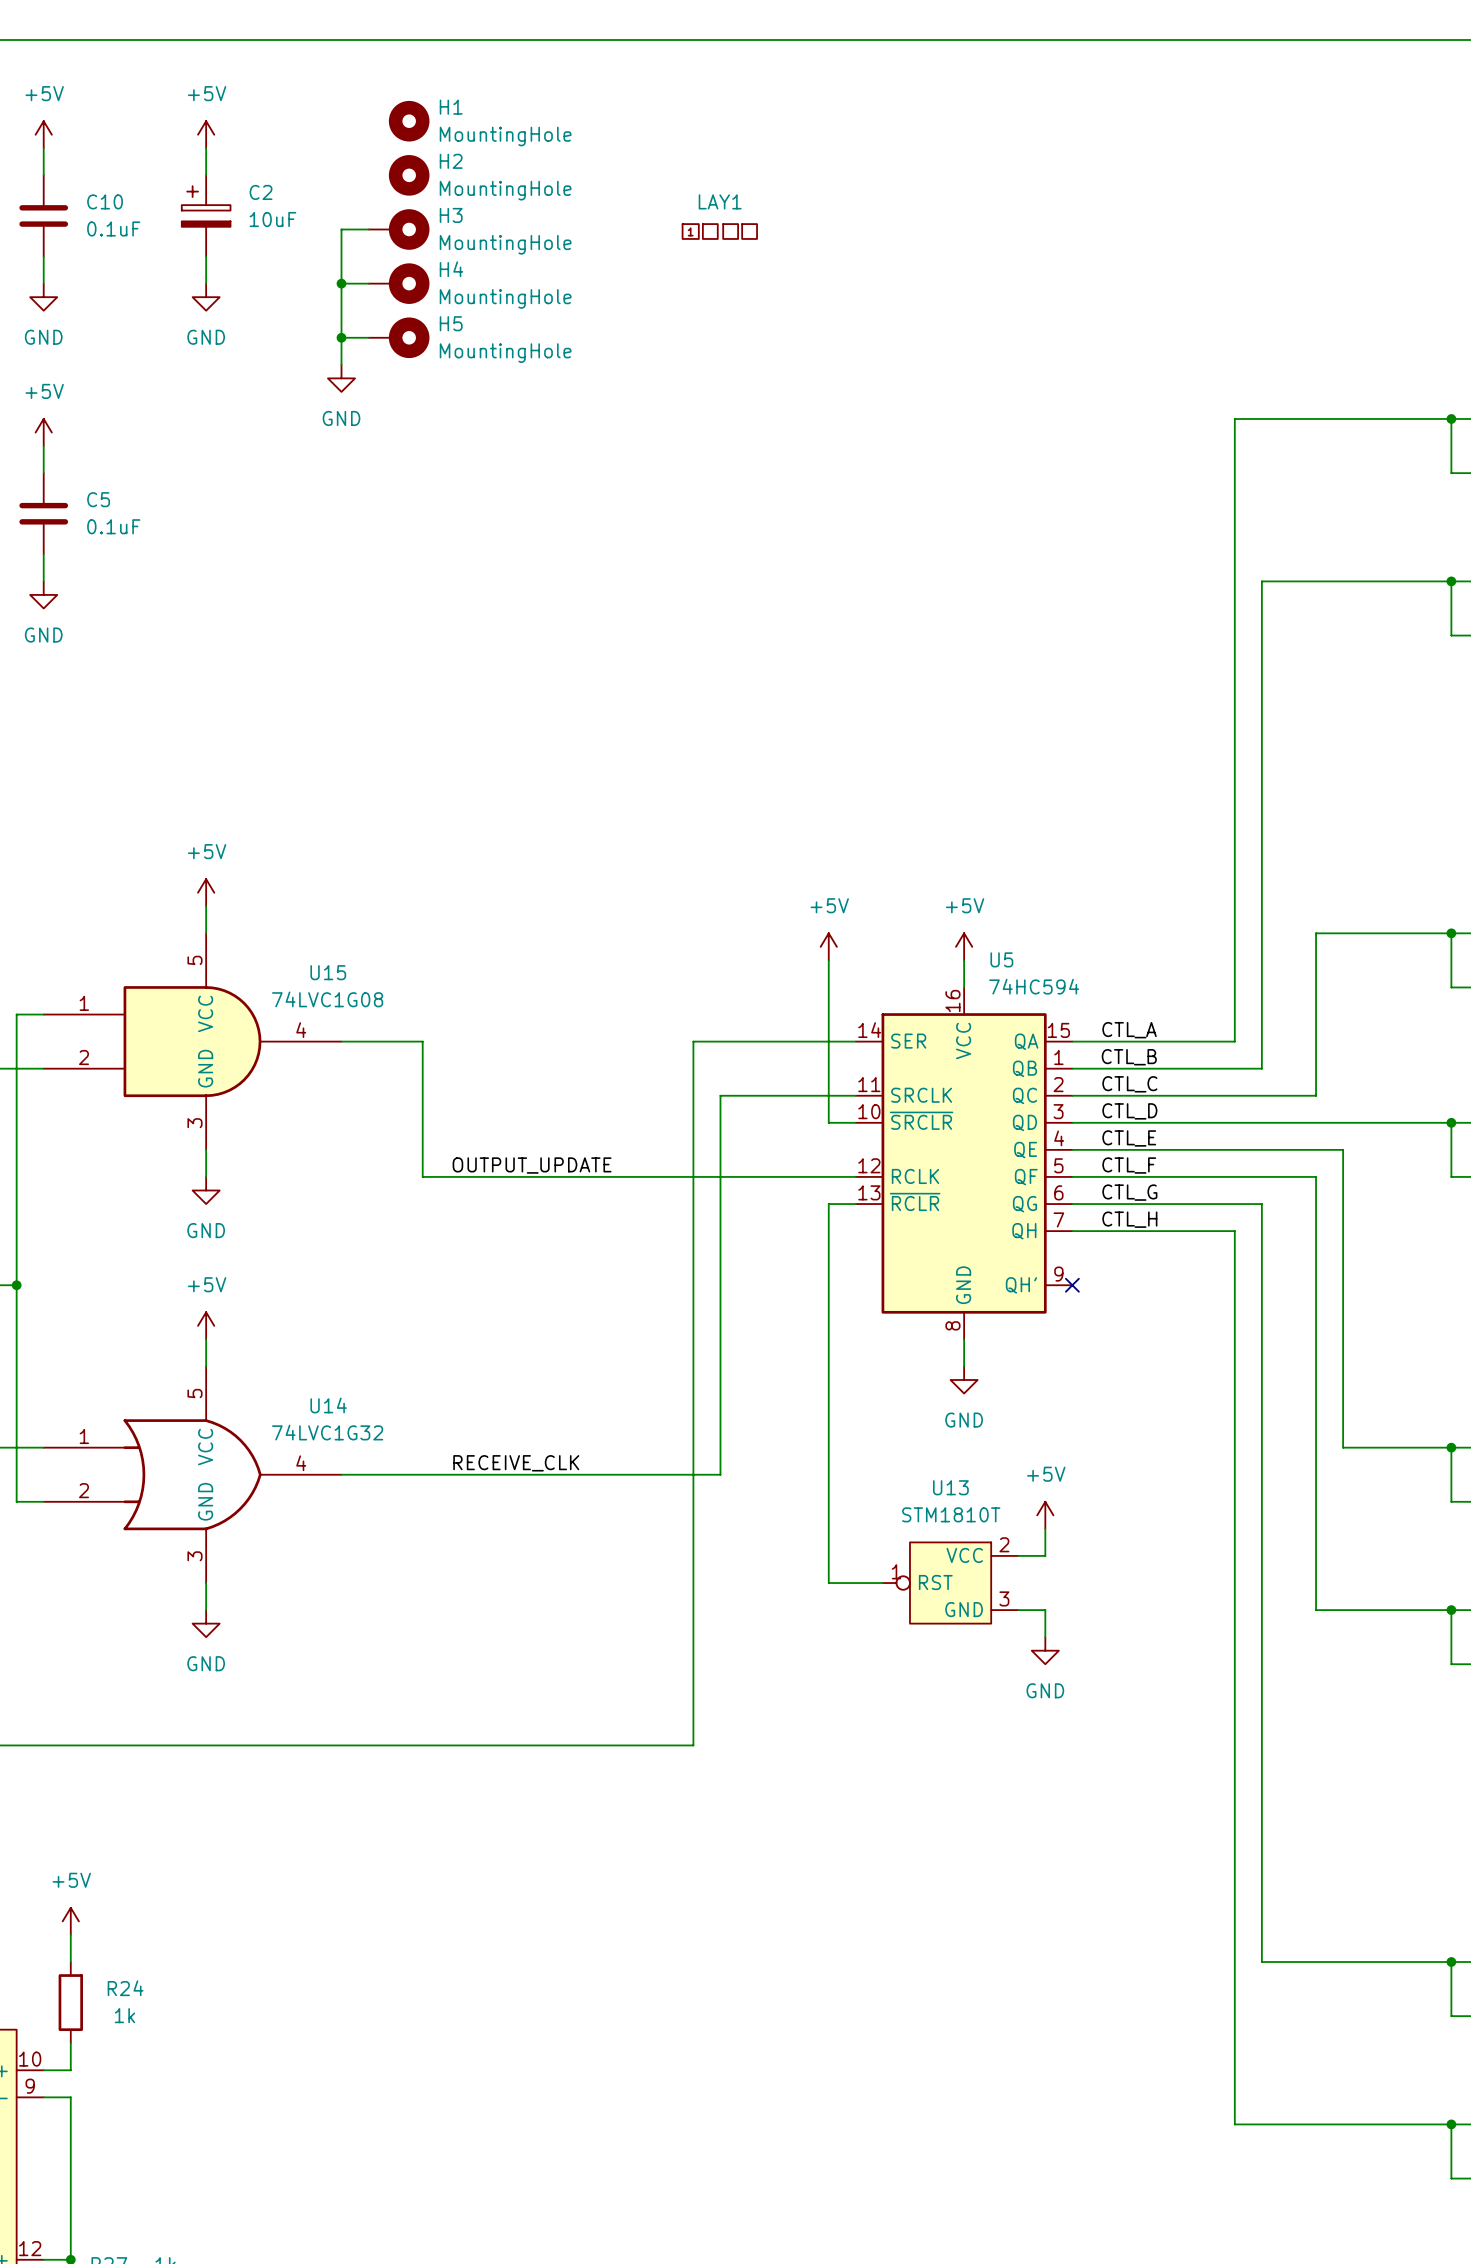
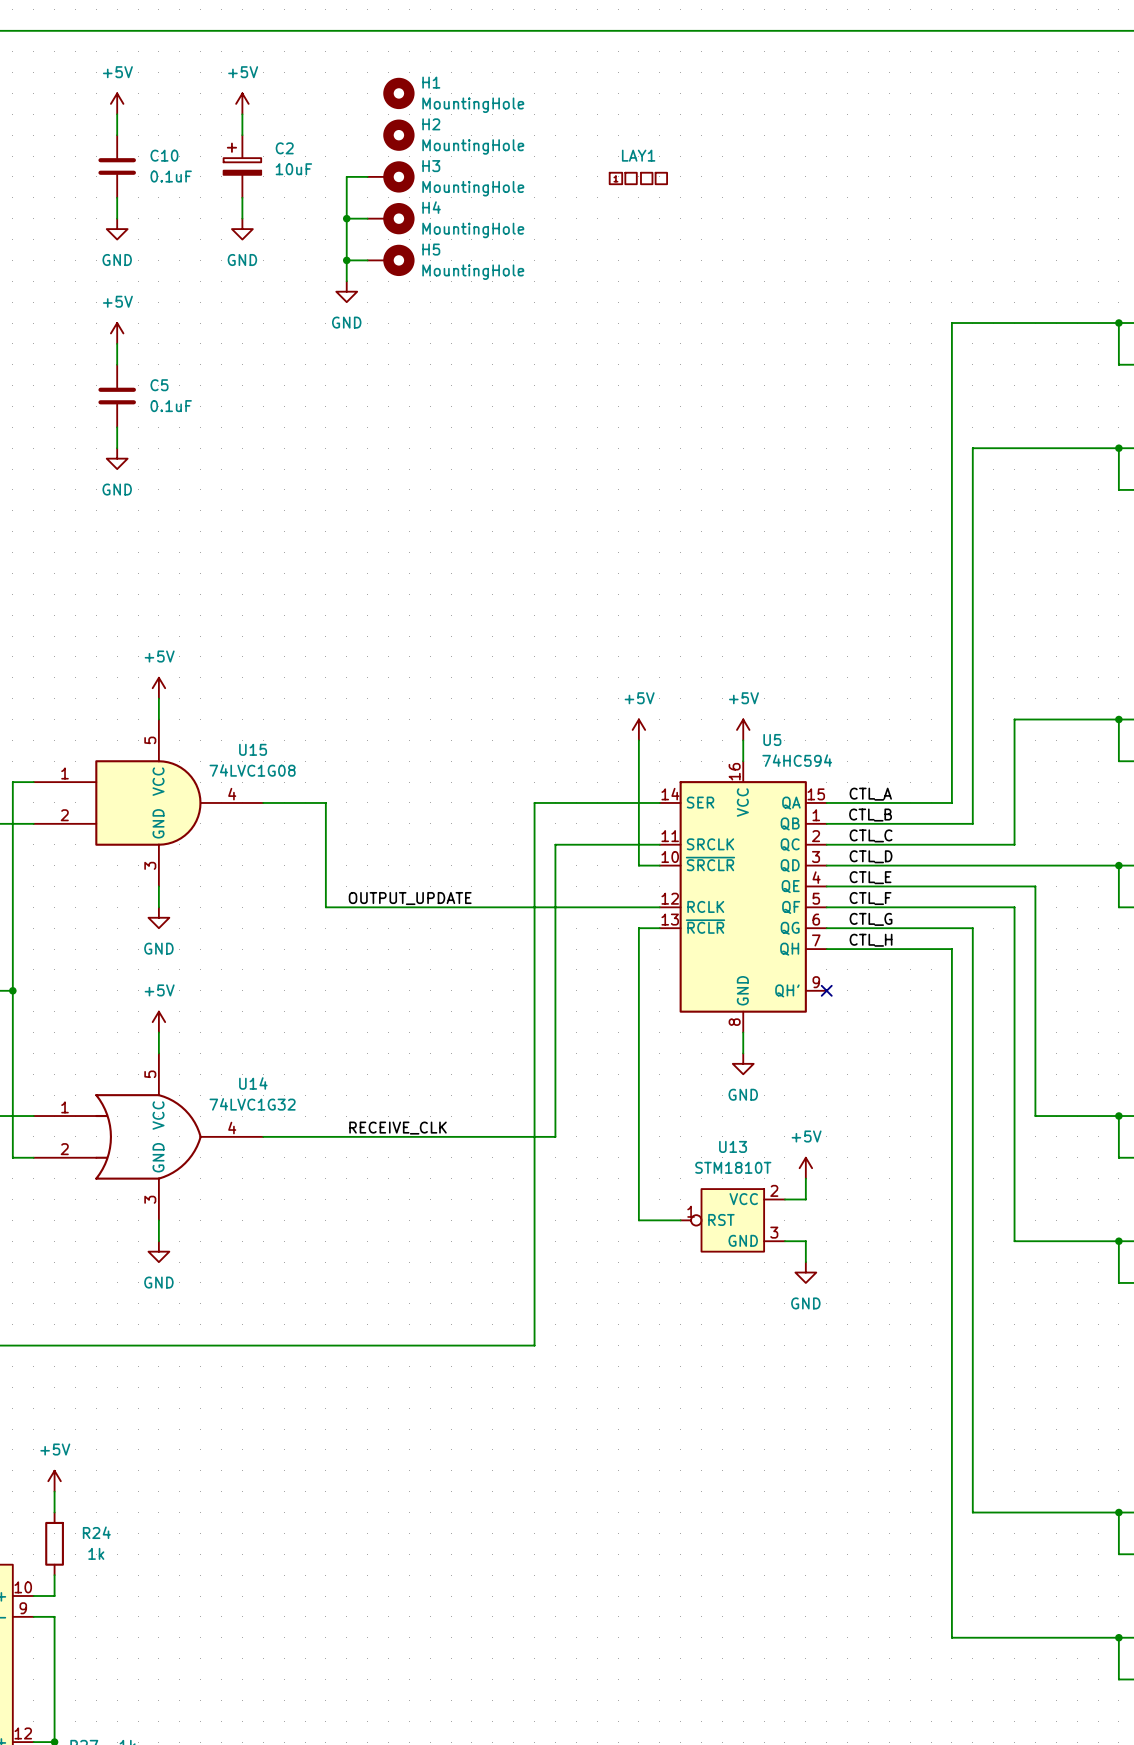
H1 position: (409, 121) -> (398, 93)
power symbol: +5V (43, 134) -> none
power symbol: none -> +5V (117, 103)
power symbol: +5V (206, 134) -> none
power symbol: none -> +5V (242, 103)
wire: (43, 148) (43, 175) -> (117, 114) (117, 135)
wire: (206, 148) (206, 175) -> (242, 114) (242, 135)
H2 position: (409, 175) -> (398, 135)
C10 position: (43, 215) -> (117, 166)
C2 position: (206, 215) -> (242, 166)
wire: (368, 229) (341, 229) (341, 364) -> (367, 176) (346, 176) (346, 281)
H3 position: (399, 229) -> (391, 176)
LAY1 position: (719, 231) -> (638, 178)
wire: (43, 256) (43, 283) -> (117, 197) (117, 218)
wire: (206, 256) (206, 283) -> (242, 197) (242, 218)
wire: (341, 283) (368, 283) -> (346, 218) (367, 218)
junction: (341, 283) -> none
H4 position: (399, 283) -> (391, 218)
junction: none -> (346, 218)
power symbol: GND (43, 297) -> none
power symbol: none -> GND (117, 229)
power symbol: GND (206, 297) -> none
power symbol: none -> GND (242, 229)
wire: (341, 337) (368, 337) -> (346, 260) (367, 260)
junction: (341, 337) -> none
H5 position: (399, 337) -> (391, 260)
junction: none -> (346, 260)
power symbol: GND (341, 378) -> none
power symbol: none -> GND (346, 291)
power symbol position: +5V (43, 432) -> +5V (117, 333)
wire: (43, 446) (43, 473) -> (117, 343) (117, 364)
C5 position: (43, 513) -> (117, 396)
wire: (43, 554) (43, 581) -> (117, 427) (117, 448)
power symbol position: GND (43, 594) -> GND (117, 458)

